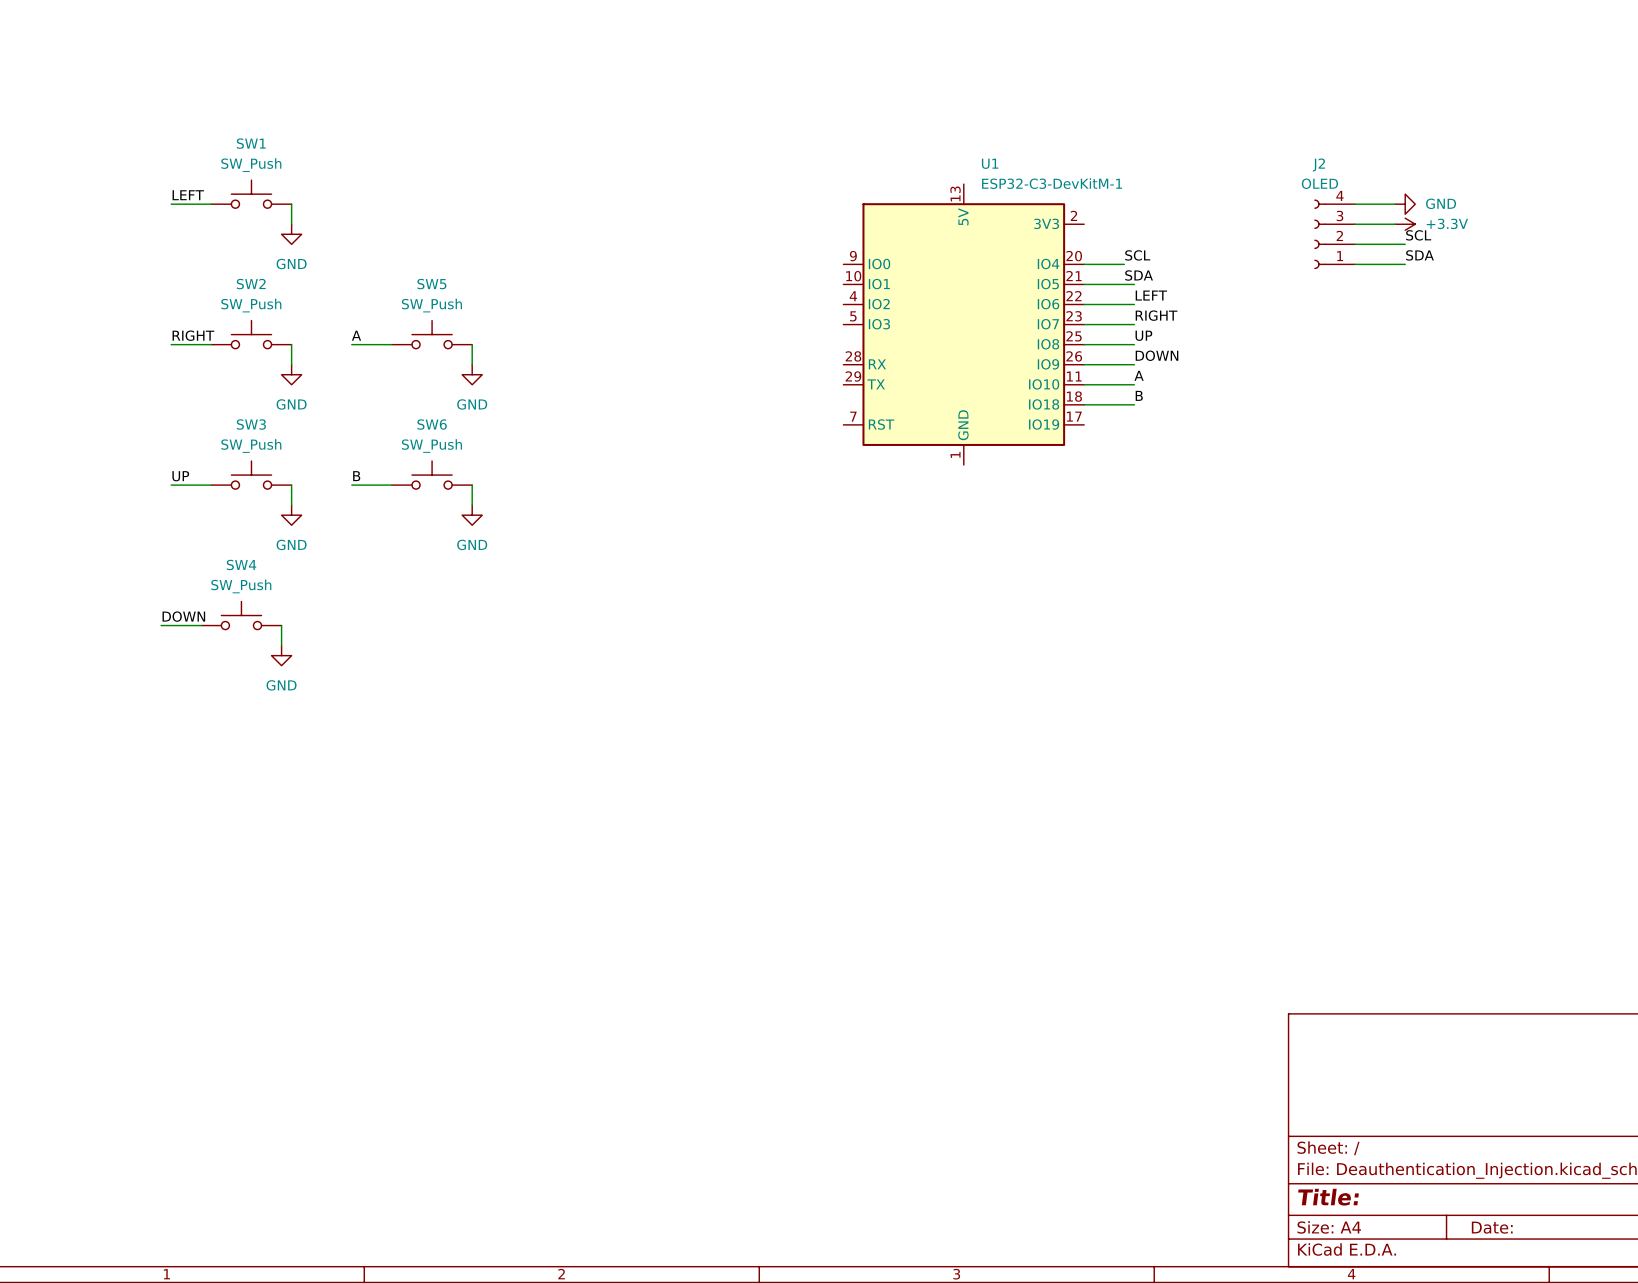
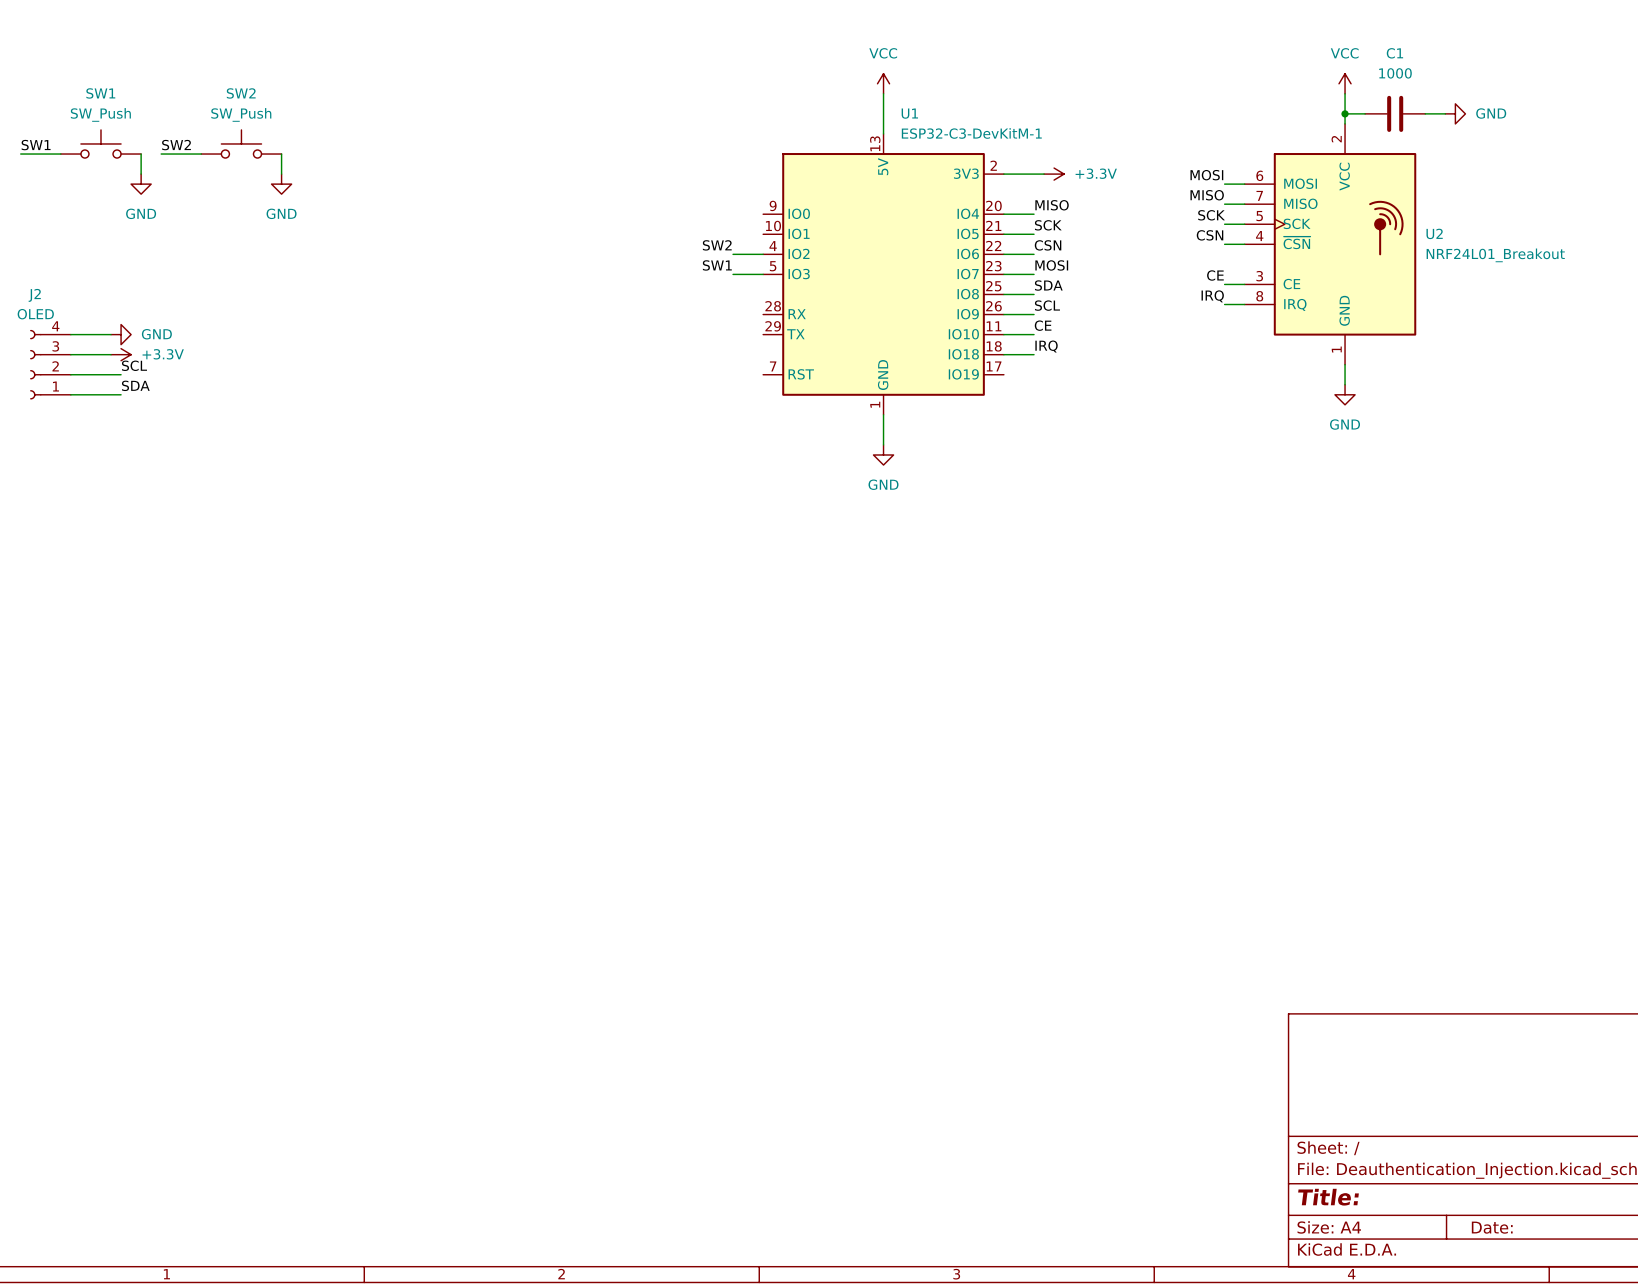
power symbol: none -> VCC (883, 83)
power symbol: none -> VCC (1345, 83)
wire: none -> (883, 93) (883, 133)
wire: none -> (1345, 93) (1345, 123)
wire: none -> (1345, 113) (1365, 113)
junction: none -> (1345, 113)
C1: none -> 1000 (1395, 113)
wire: none -> (1425, 113) (1445, 113)
power symbol: none -> GND (1455, 113)
label: none -> SW1 (36, 145)
label: none -> SW2 (176, 145)
wire: none -> (20, 154) (60, 154)
wire: none -> (141, 154) (141, 174)
power symbol: none -> +3.3V (1054, 174)
label: none -> MOSI (1206, 175)
power symbol: none -> GND (141, 184)
wire: none -> (1224, 184) (1244, 184)
SW1 position: (251, 194) -> (100, 143)
label: LEFT (188, 195) -> none
label: none -> MISO (1207, 195)
wire: (171, 204) (211, 204) -> (161, 154) (201, 154)
wire: (291, 204) (291, 224) -> (281, 154) (281, 174)
wire: none -> (1224, 204) (1244, 204)
power symbol: GND (1405, 204) -> none
label: none -> MISO (1052, 205)
label: none -> SCK (1211, 215)
wire: none -> (1224, 224) (1244, 224)
power symbol: +3.3V (1405, 224) -> none
label: none -> SCK (1048, 225)
power symbol position: GND (291, 234) -> GND (281, 184)
J2 position: (1334, 234) -> (50, 364)
label: none -> CSN (1210, 235)
label: SCL (1418, 235) -> none
wire: none -> (1224, 244) (1244, 244)
U2: none -> NRF24L01_Breakout (1330, 244)
label: none -> SW2 (717, 245)
label: none -> CSN (1048, 245)
wire: none -> (733, 254) (763, 254)
label position: SCL (1137, 255) -> SCL (1047, 305)
label: SDA (1419, 255) -> none
wire: (1084, 264) (1124, 264) -> (1003, 174) (1044, 174)
label: none -> SW1 (717, 265)
label: none -> MOSI (1051, 265)
wire: none -> (733, 274) (763, 274)
label position: SDA (1139, 275) -> SDA (1048, 285)
label: none -> CE (1215, 275)
wire: (1084, 284) (1134, 284) -> none
wire: none -> (1224, 284) (1244, 284)
label: LEFT (1151, 295) -> none
label: none -> IRQ (1212, 296)
wire: (1084, 304) (1134, 304) -> none
wire: none -> (1224, 304) (1244, 304)
label: RIGHT (1156, 315) -> none
U1 position: (963, 324) -> (883, 274)
wire: (1084, 324) (1134, 324) -> none
label: none -> CE (1043, 325)
power symbol: none -> GND (121, 334)
SW2 position: (251, 334) -> (241, 143)
SW5: SW_Push (432, 334) -> none
label: RIGHT (193, 335) -> none
label: A (356, 335) -> none
label: UP (1143, 335) -> none
wire: (171, 344) (211, 344) -> (70, 334) (111, 334)
wire: (291, 344) (291, 364) -> none
wire: (351, 344) (391, 344) -> none
wire: (472, 344) (472, 364) -> none
wire: (1084, 344) (1134, 344) -> none
label: none -> IRQ (1046, 346)
power symbol: none -> +3.3V (121, 354)
label: DOWN (1157, 355) -> none
wire: (1084, 364) (1134, 364) -> none
wire: none -> (1345, 364) (1345, 384)
label: none -> SCL (134, 365)
wire: none -> (70, 374) (121, 374)
power symbol: GND (291, 374) -> none
power symbol: GND (472, 374) -> none
label: A (1139, 375) -> none
wire: (1084, 384) (1134, 384) -> none
label: none -> SDA (135, 385)
wire: none -> (70, 394) (121, 394)
power symbol: none -> GND (1345, 394)
label: B (1139, 395) -> none
wire: (1084, 404) (1134, 404) -> none
power symbol: none -> GND (883, 454)
SW3: SW_Push (251, 475) -> none
SW6: SW_Push (432, 475) -> none
label: UP (180, 476) -> none
label: B (356, 476) -> none
wire: (171, 485) (211, 485) -> (70, 354) (111, 354)
wire: (291, 485) (291, 505) -> none
wire: (351, 485) (391, 485) -> none
wire: (472, 485) (472, 505) -> none
power symbol: GND (291, 515) -> none
power symbol: GND (472, 515) -> none
SW4: SW_Push (241, 615) -> none
label: DOWN (183, 616) -> none
wire: (161, 625) (201, 625) -> none
wire: (281, 625) (281, 645) -> none
power symbol: GND (281, 655) -> none

